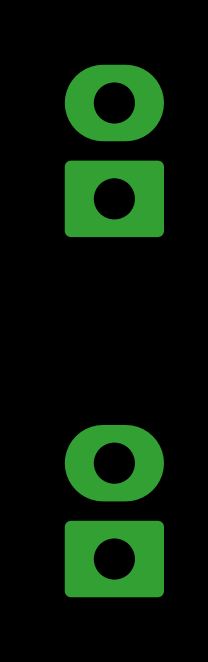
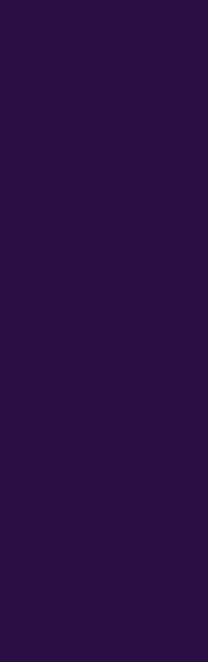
part: (114, 150) -> none
part: (114, 511) -> none

